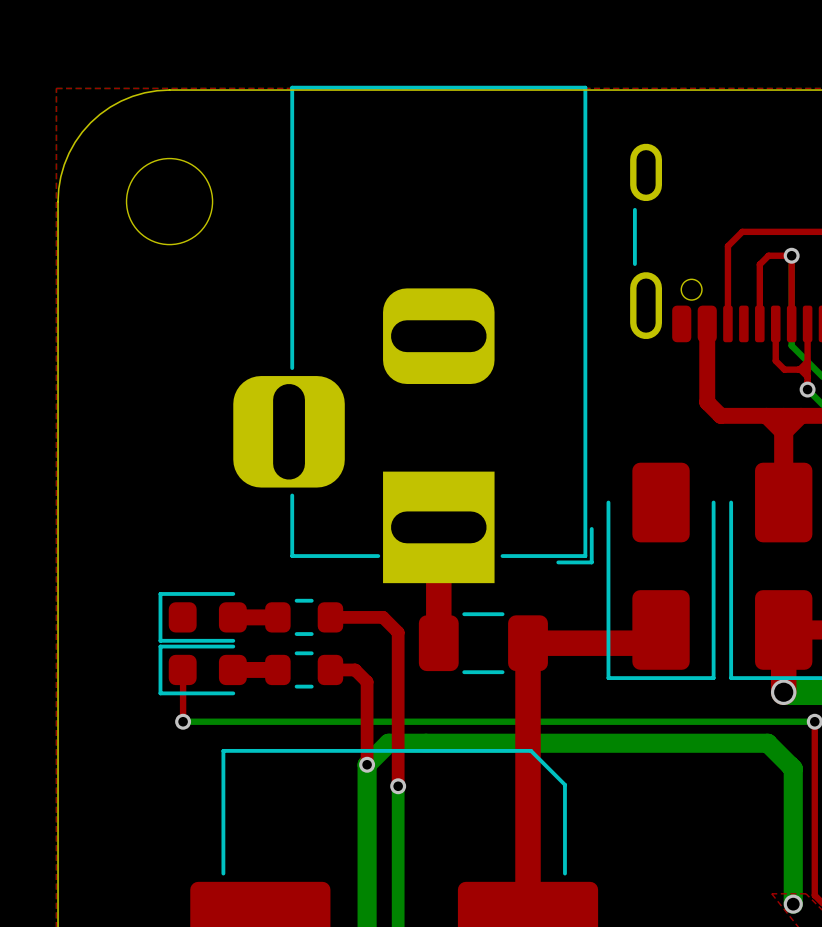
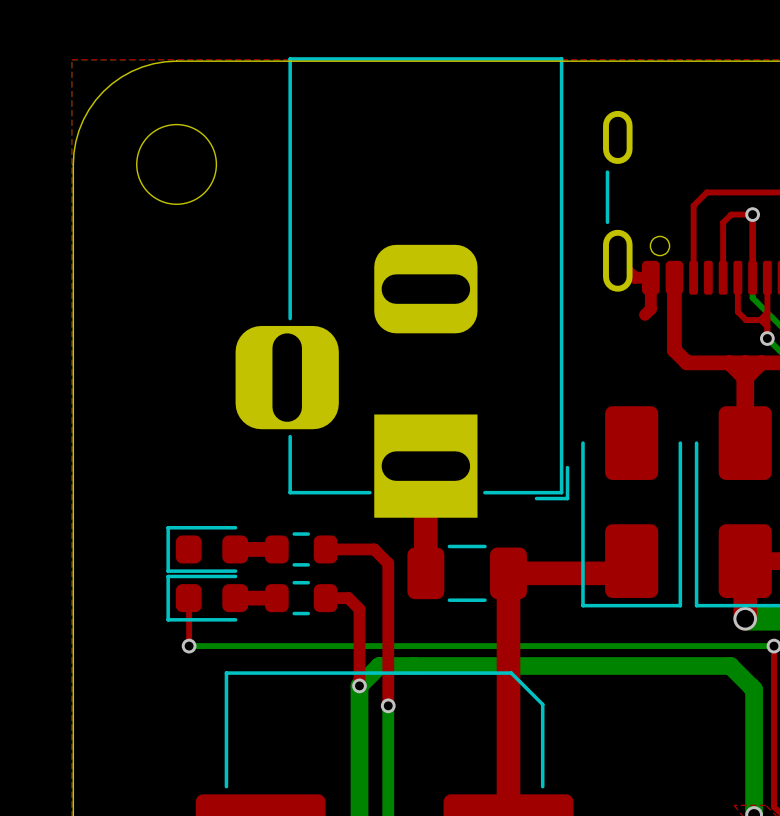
top track: none -> (617, 260) (634, 277) (650, 277) (650, 309) (644, 314)

